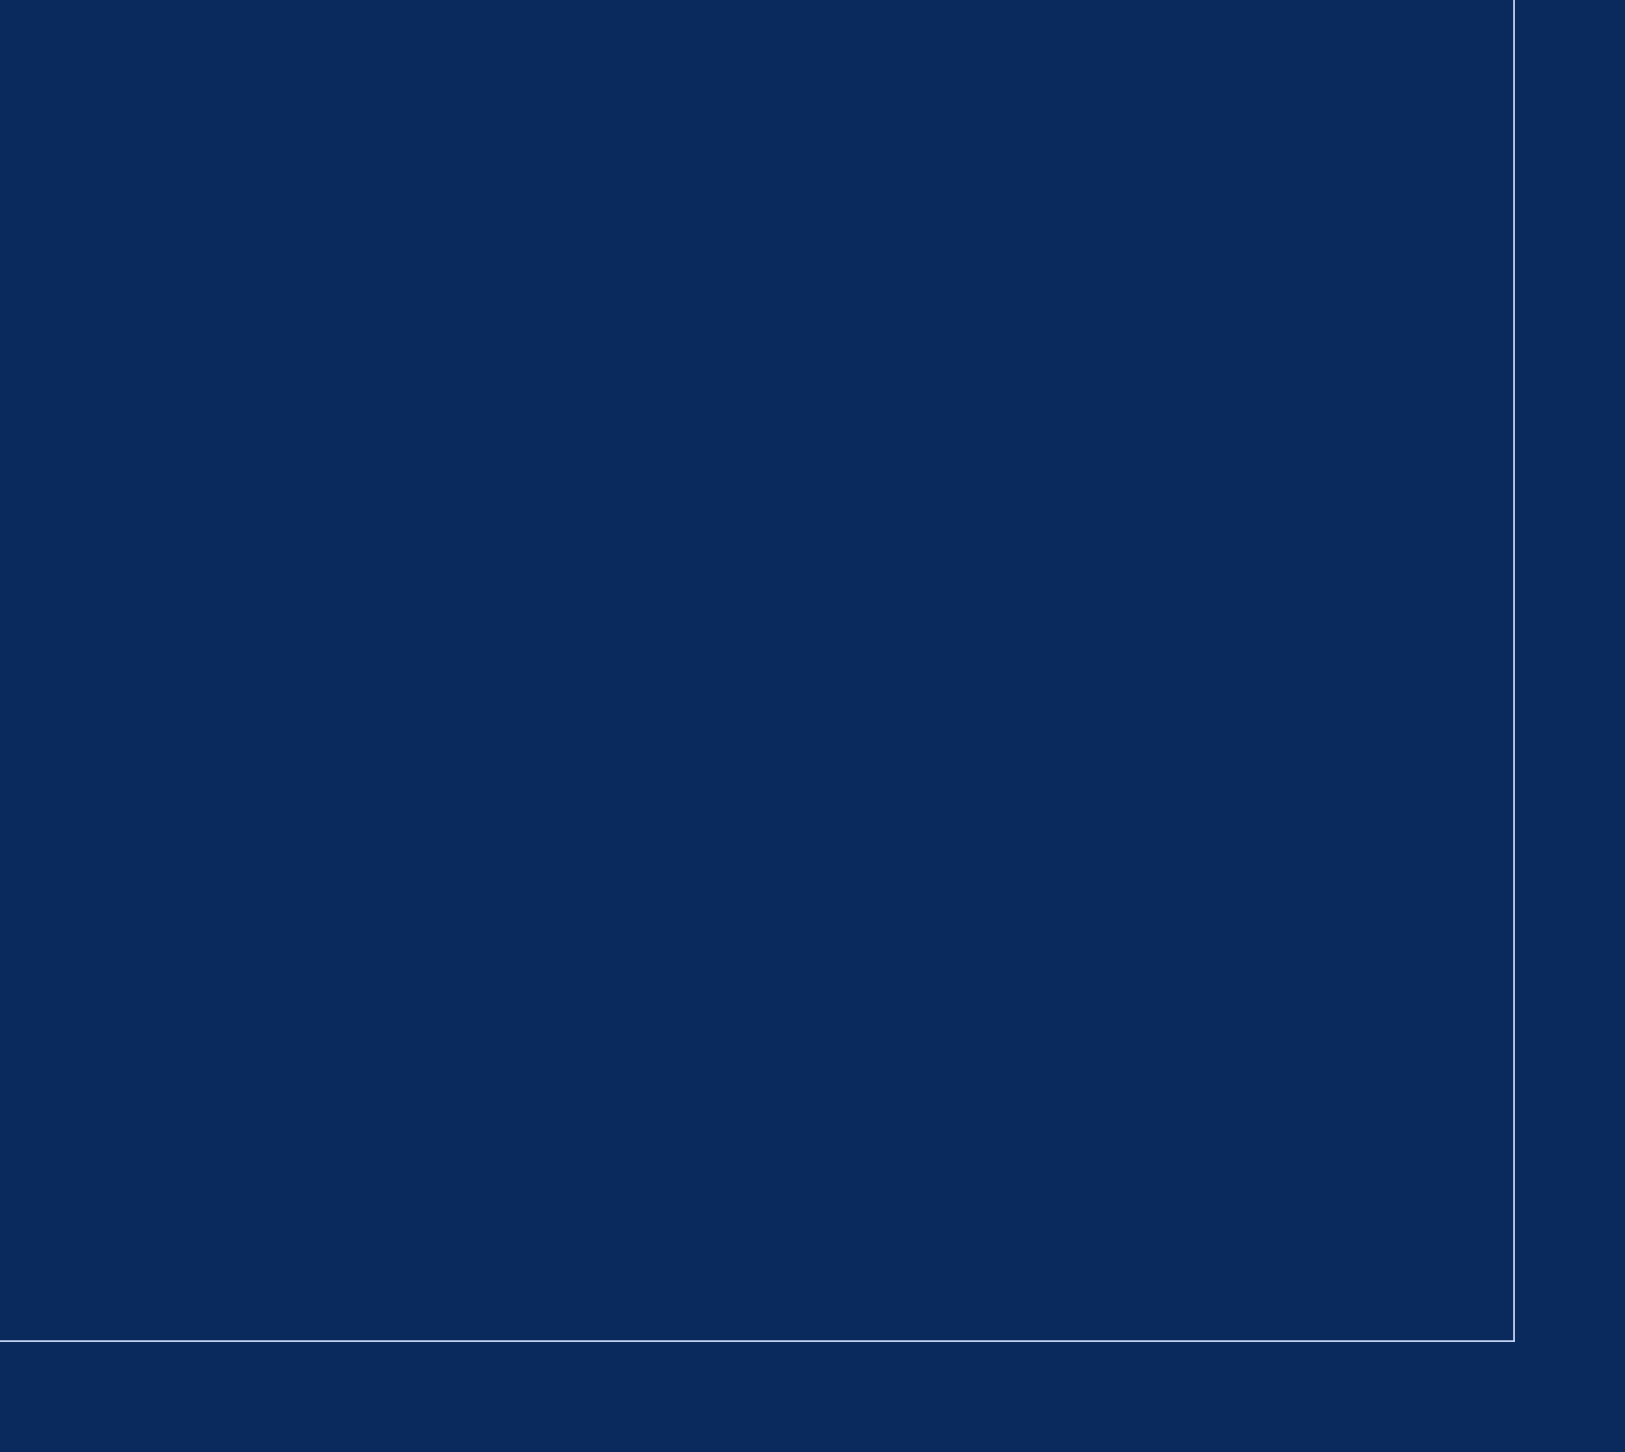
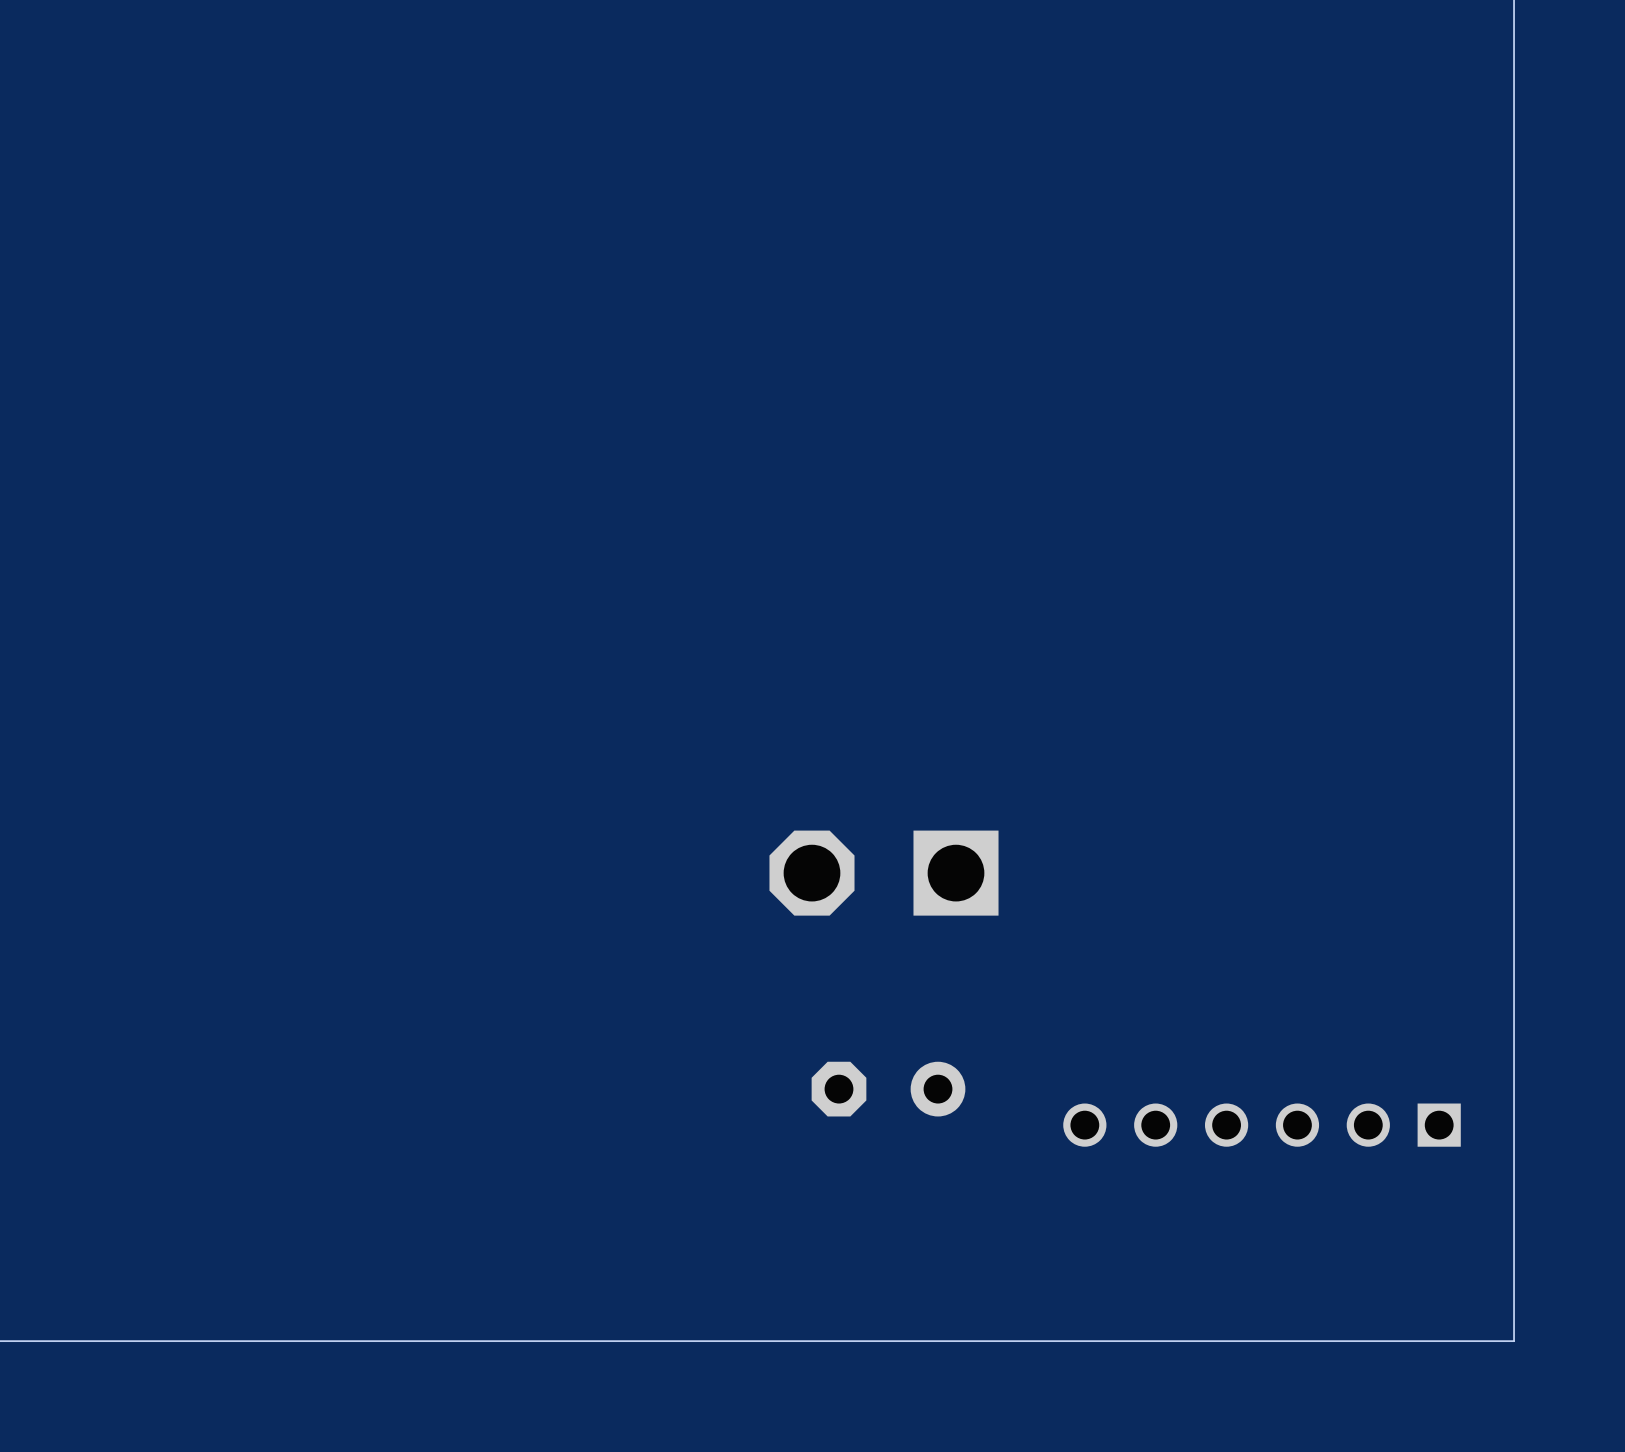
part: none -> (884, 873)
part: none -> (888, 1089)
part: none -> (1262, 1125)

